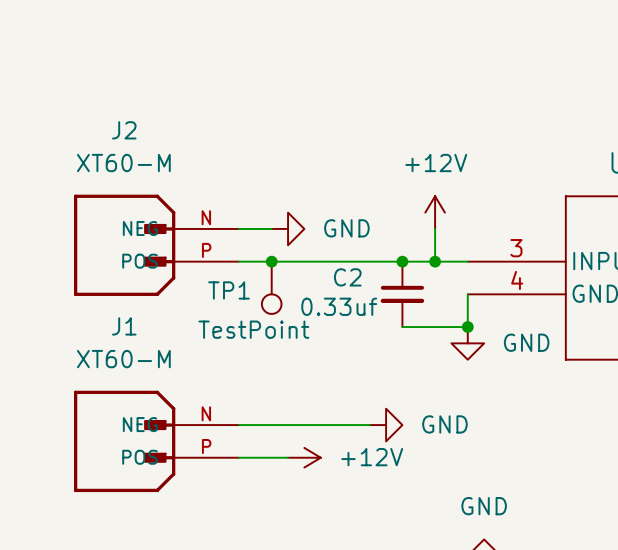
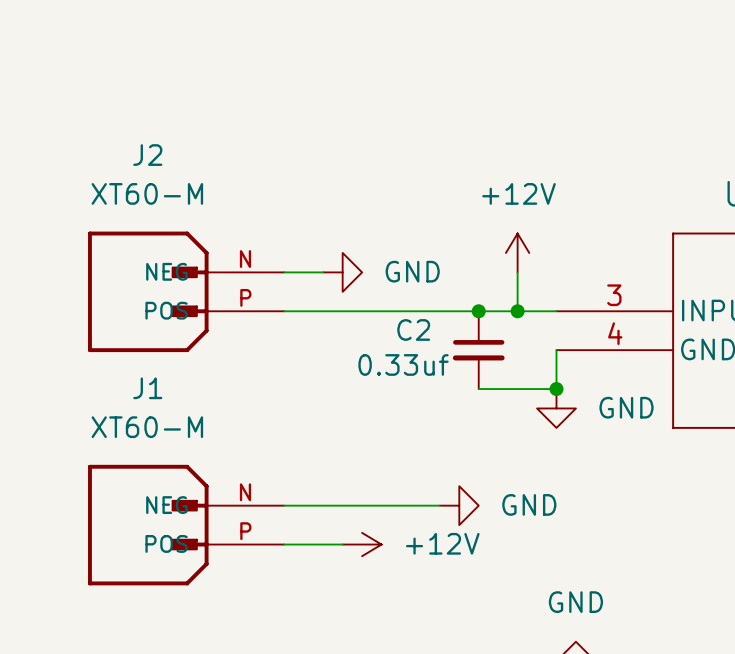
junction: (271, 261) -> none
TP1: TestPoint (271, 287) -> none

